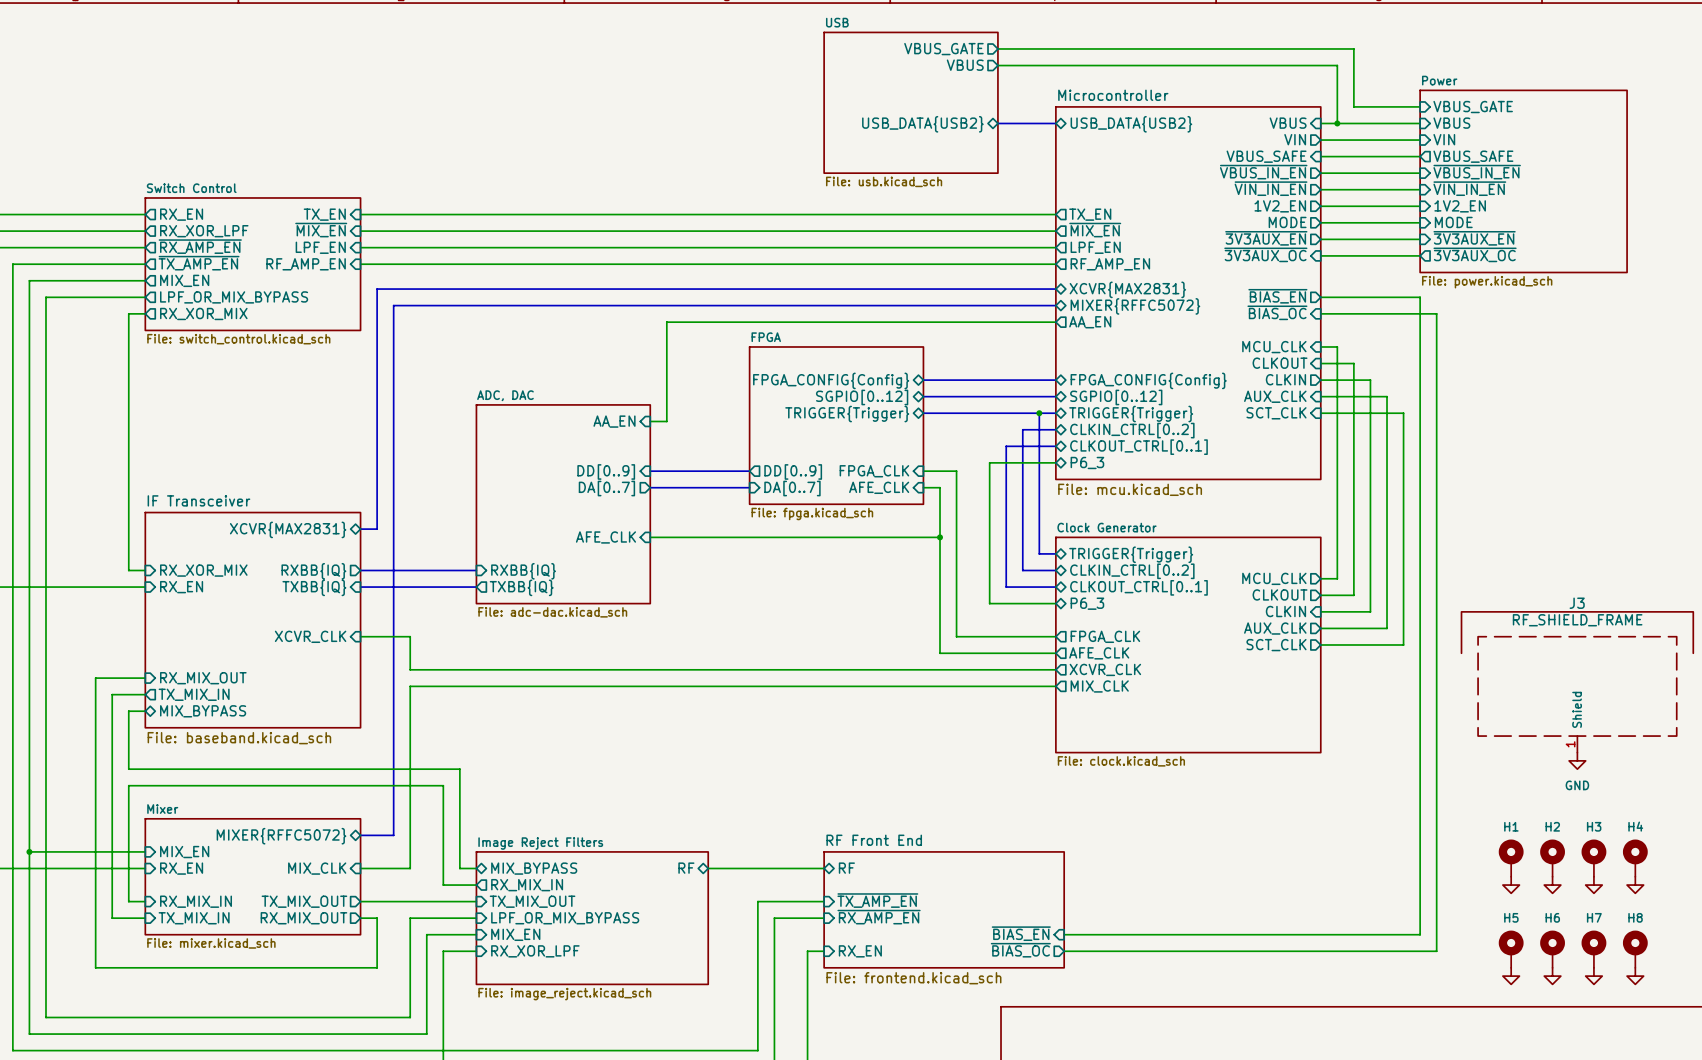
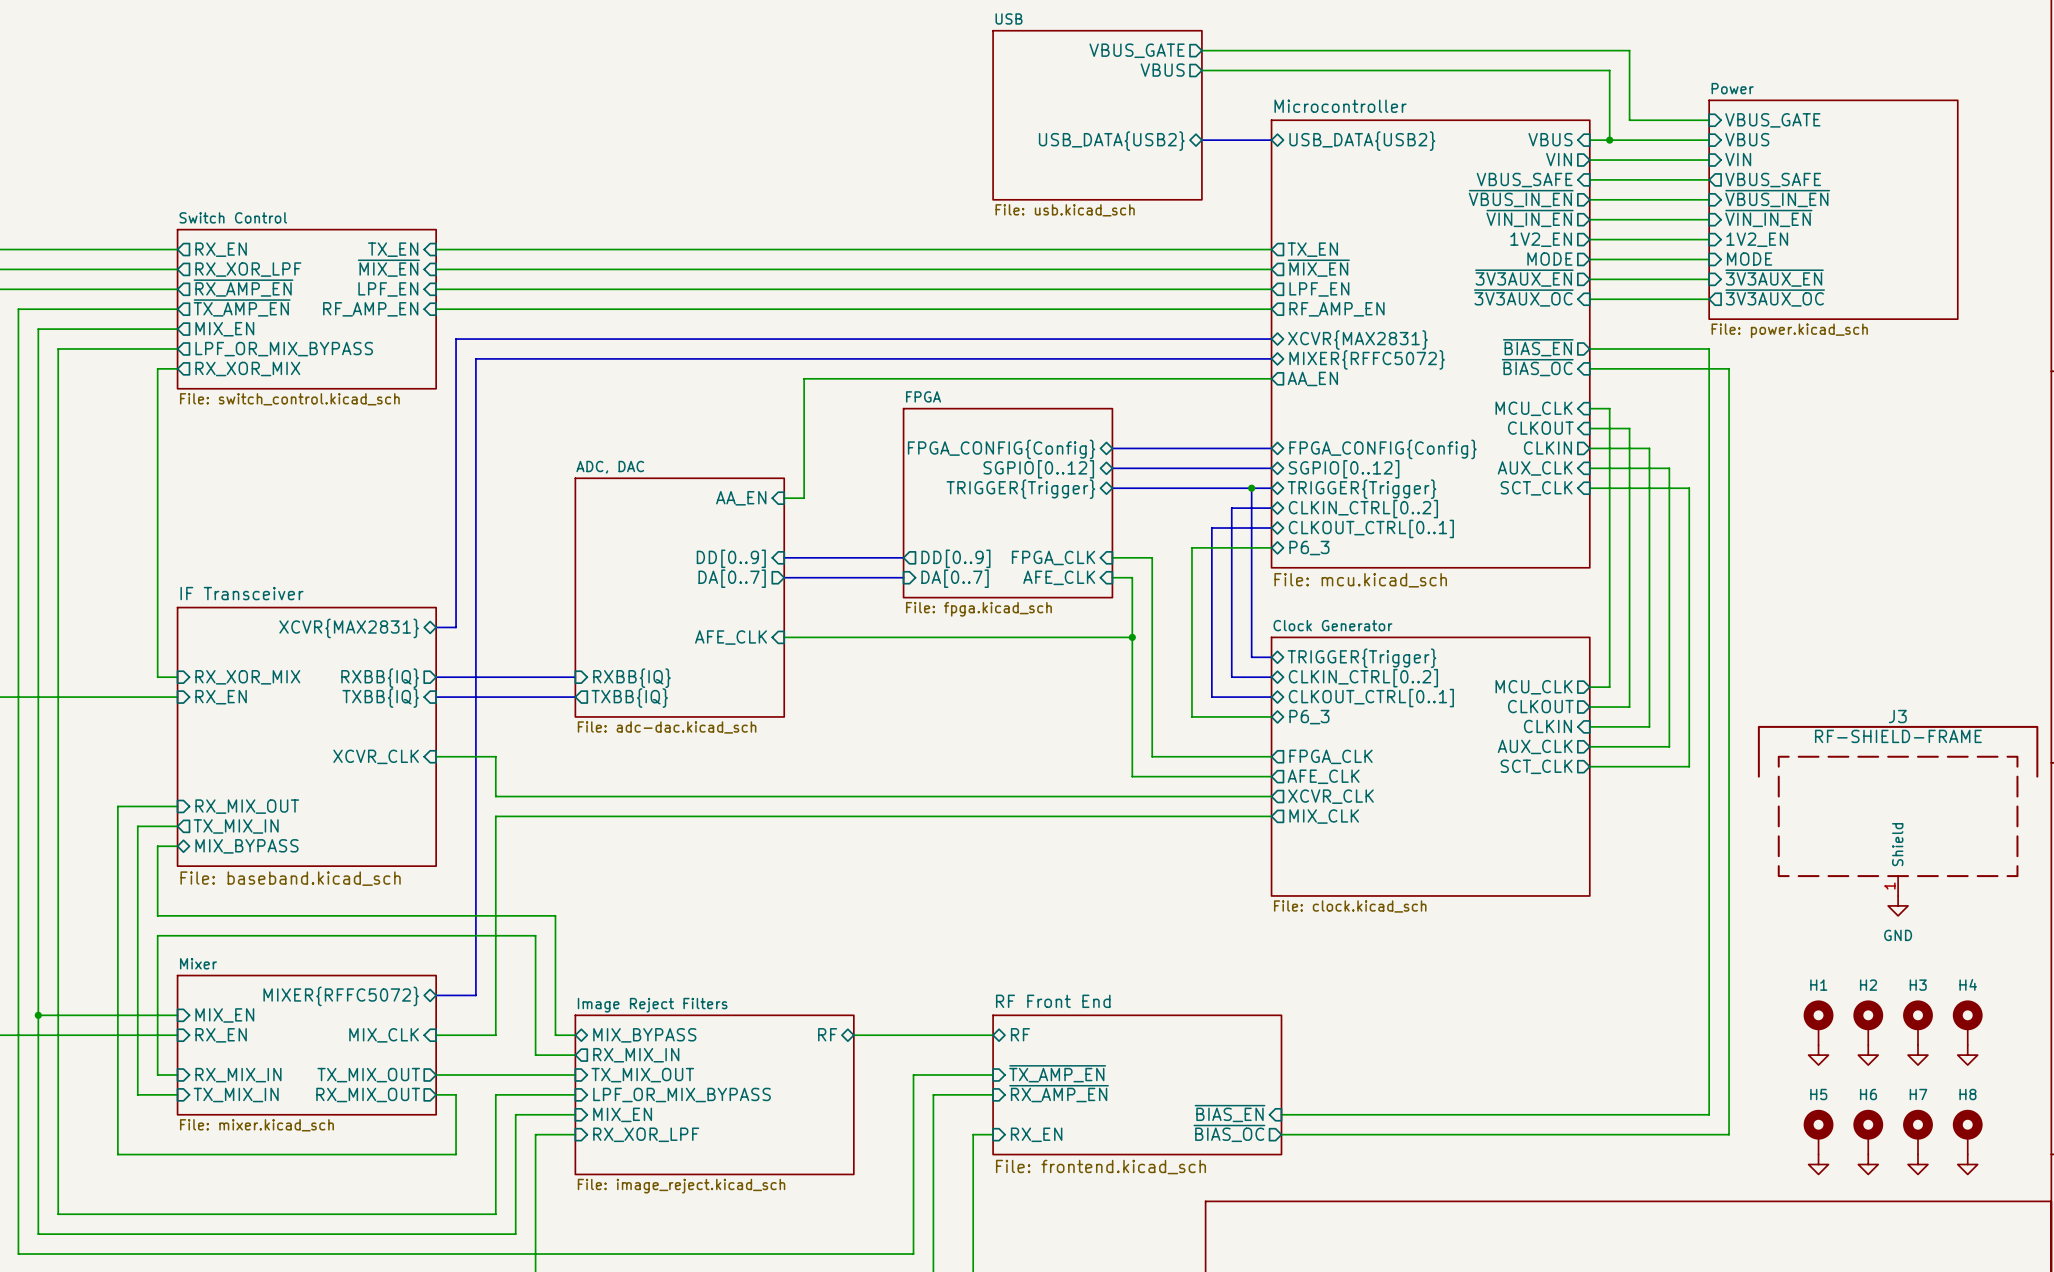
J3 value: RF_SHIELD_FRAME (1577, 620) -> RF-SHIELD-FRAME (1898, 736)

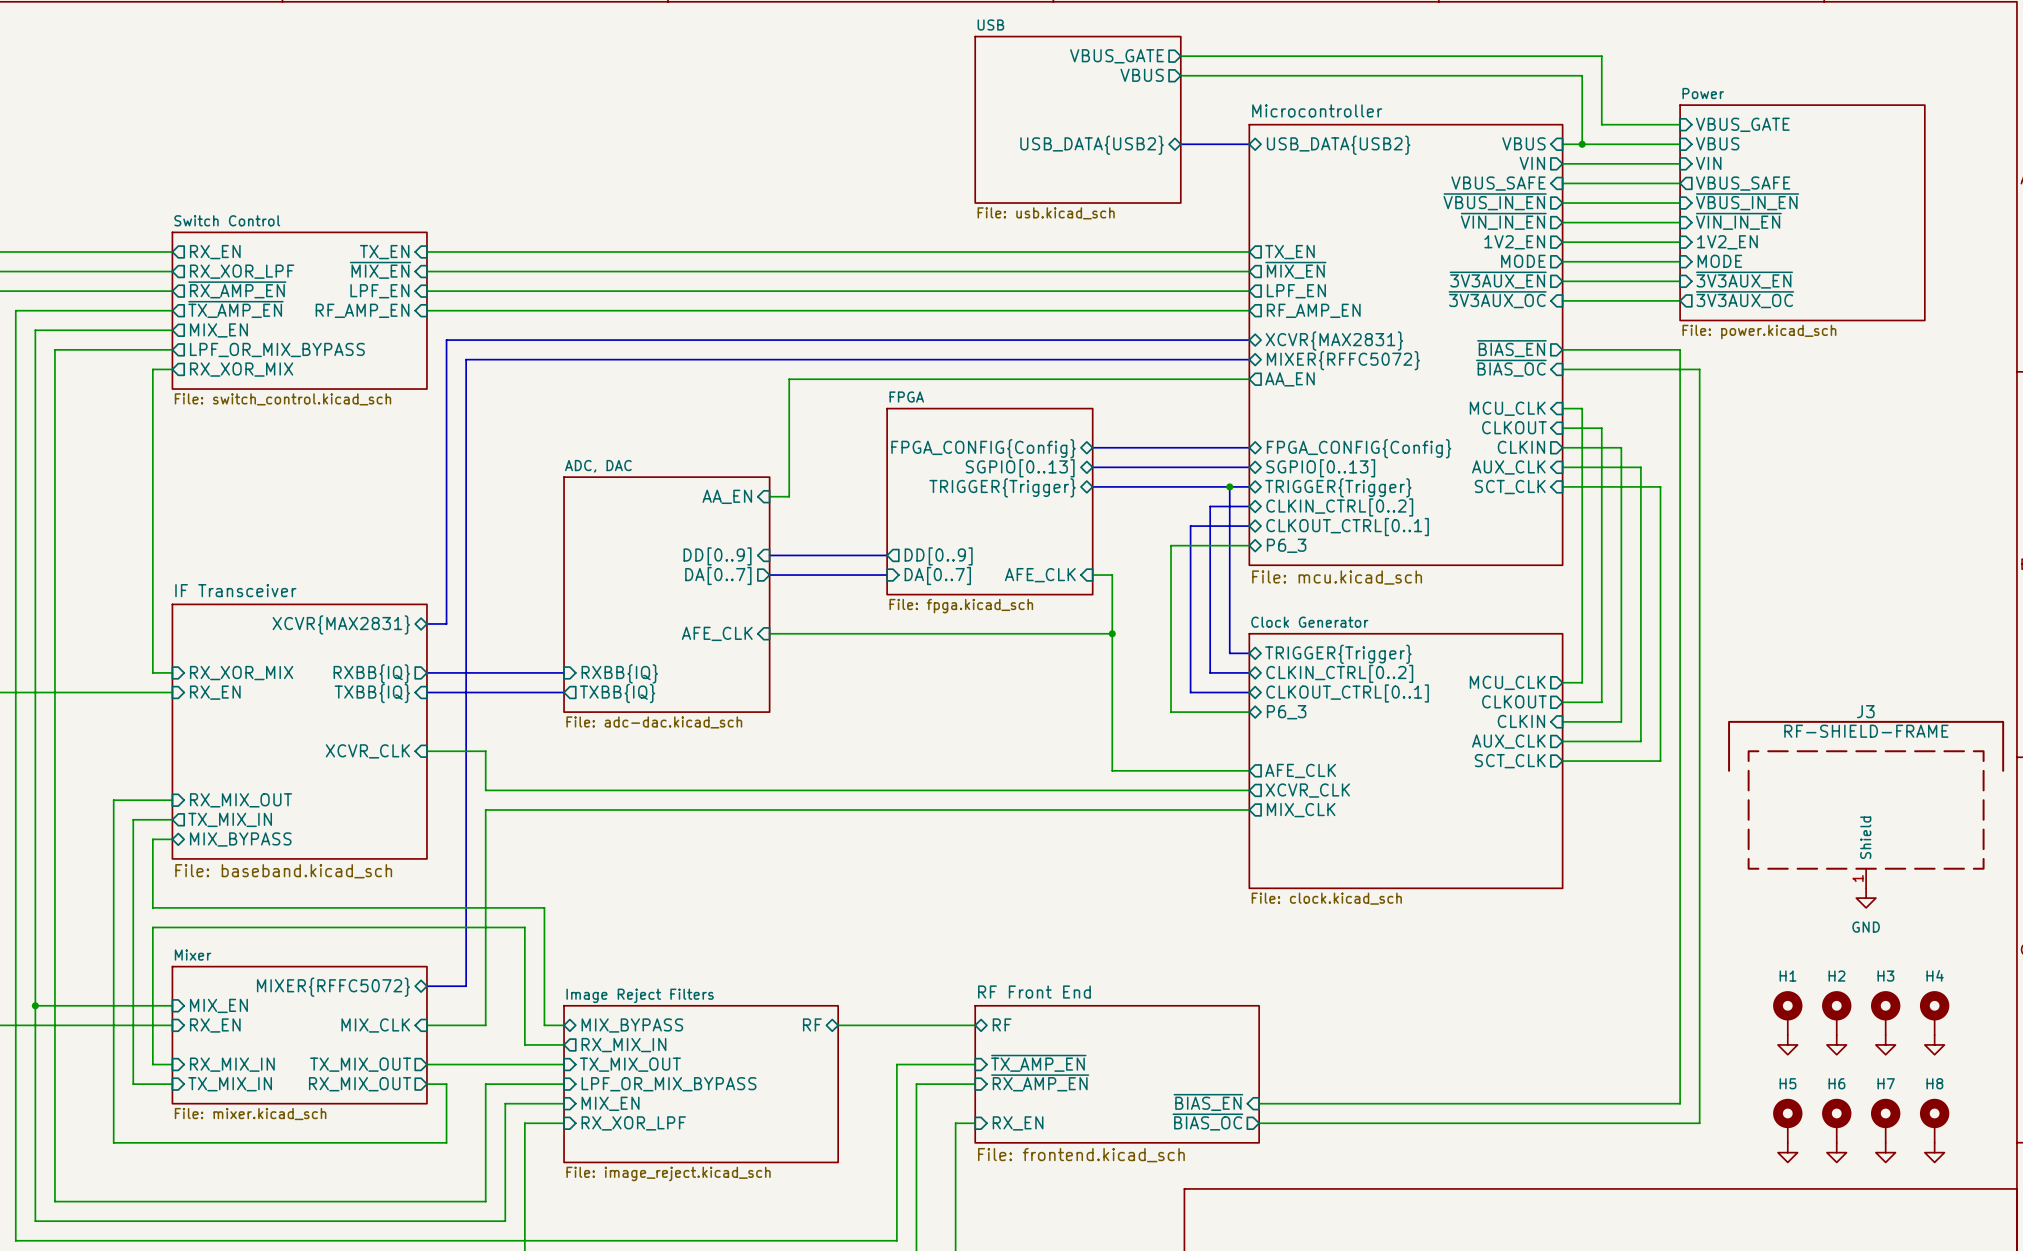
sheet pin: SGPIO[0..12] (1038, 469) -> SGPIO[0..13] (1020, 468)
sheet pin: SGPIO[0..12] (1344, 469) -> SGPIO[0..13] (1320, 468)
sheet pin: FPGA_CLK (1053, 557) -> none
wire: (1112, 557) (1152, 557) (1152, 756) (1271, 756) -> none
sheet pin: FPGA_CLK (1331, 756) -> none

